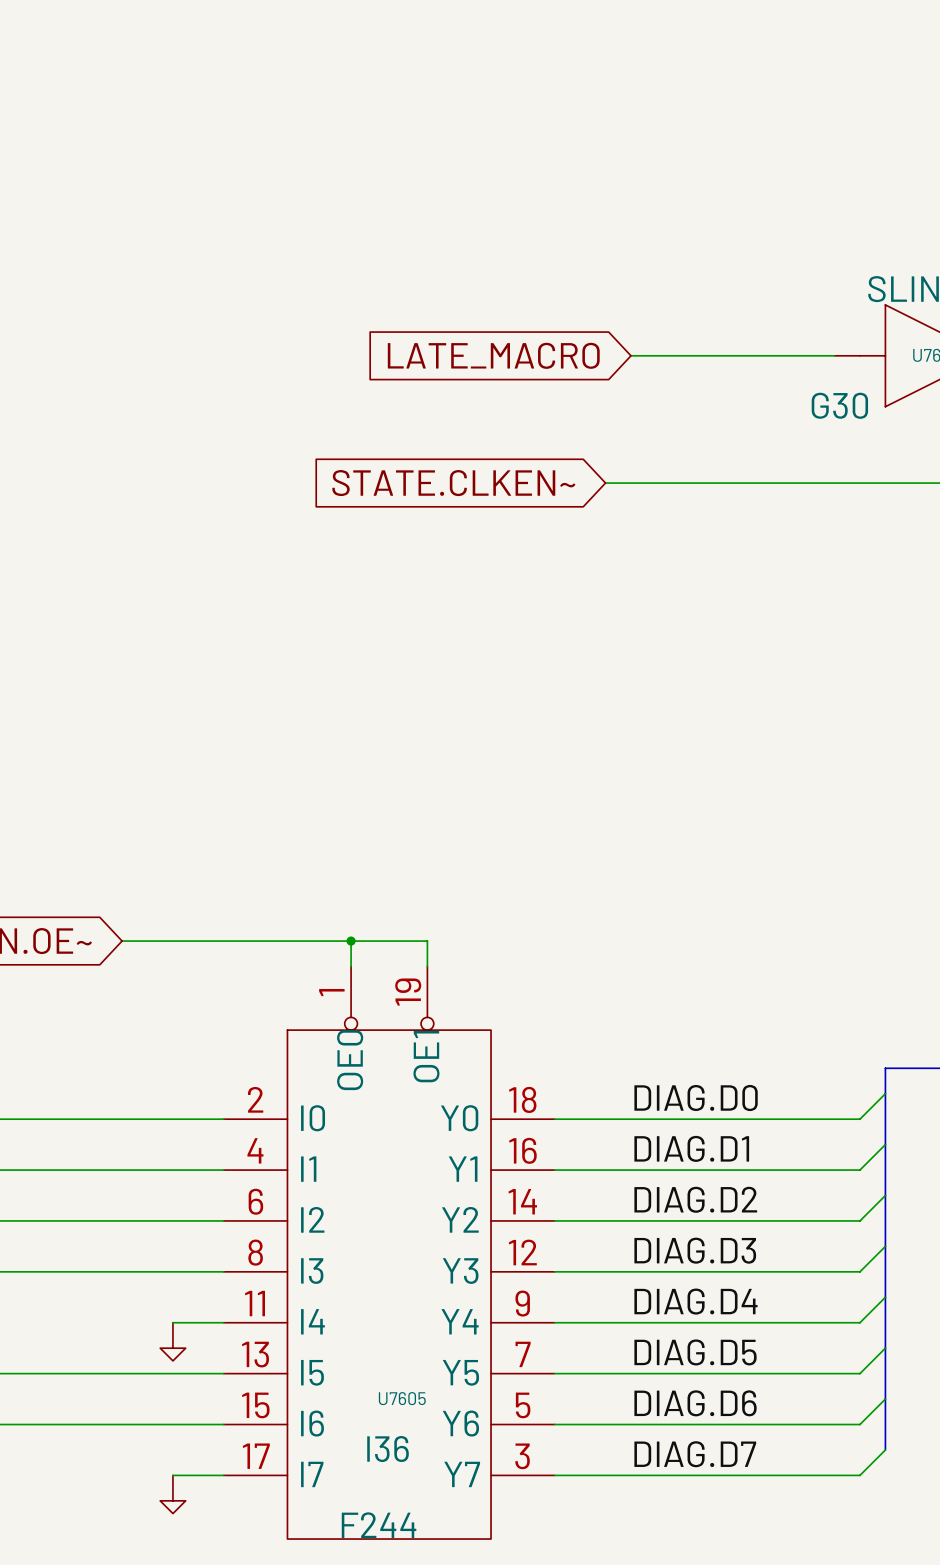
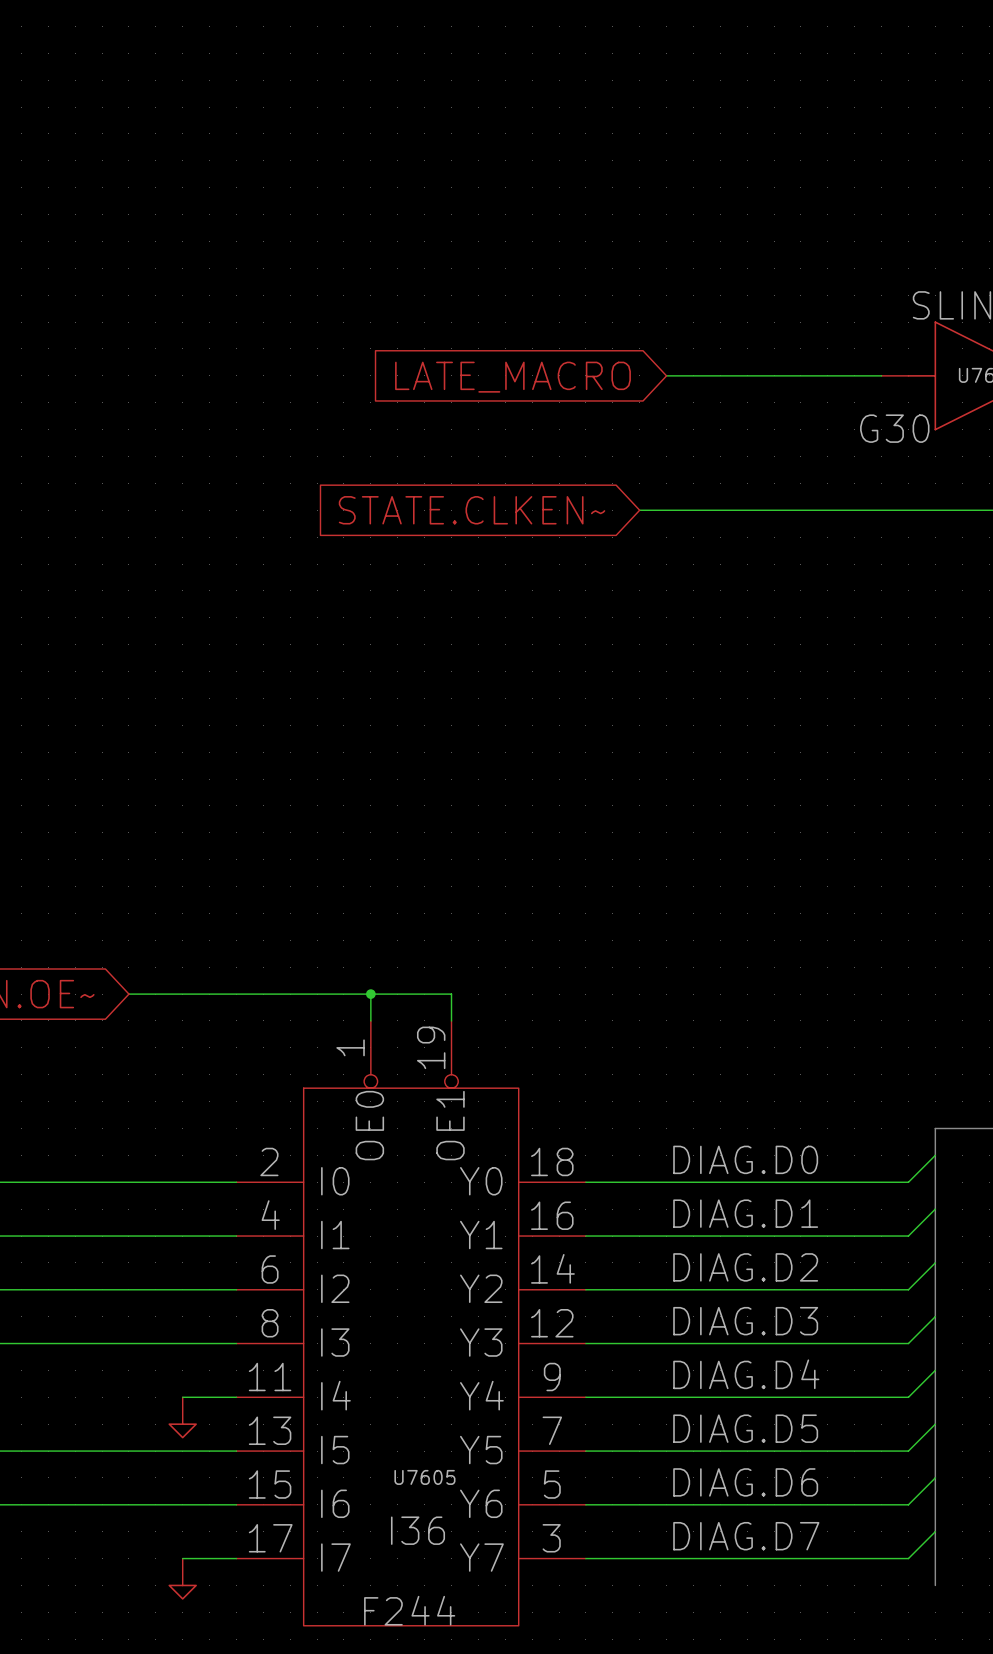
bus: none -> (935, 1531) (935, 1585)

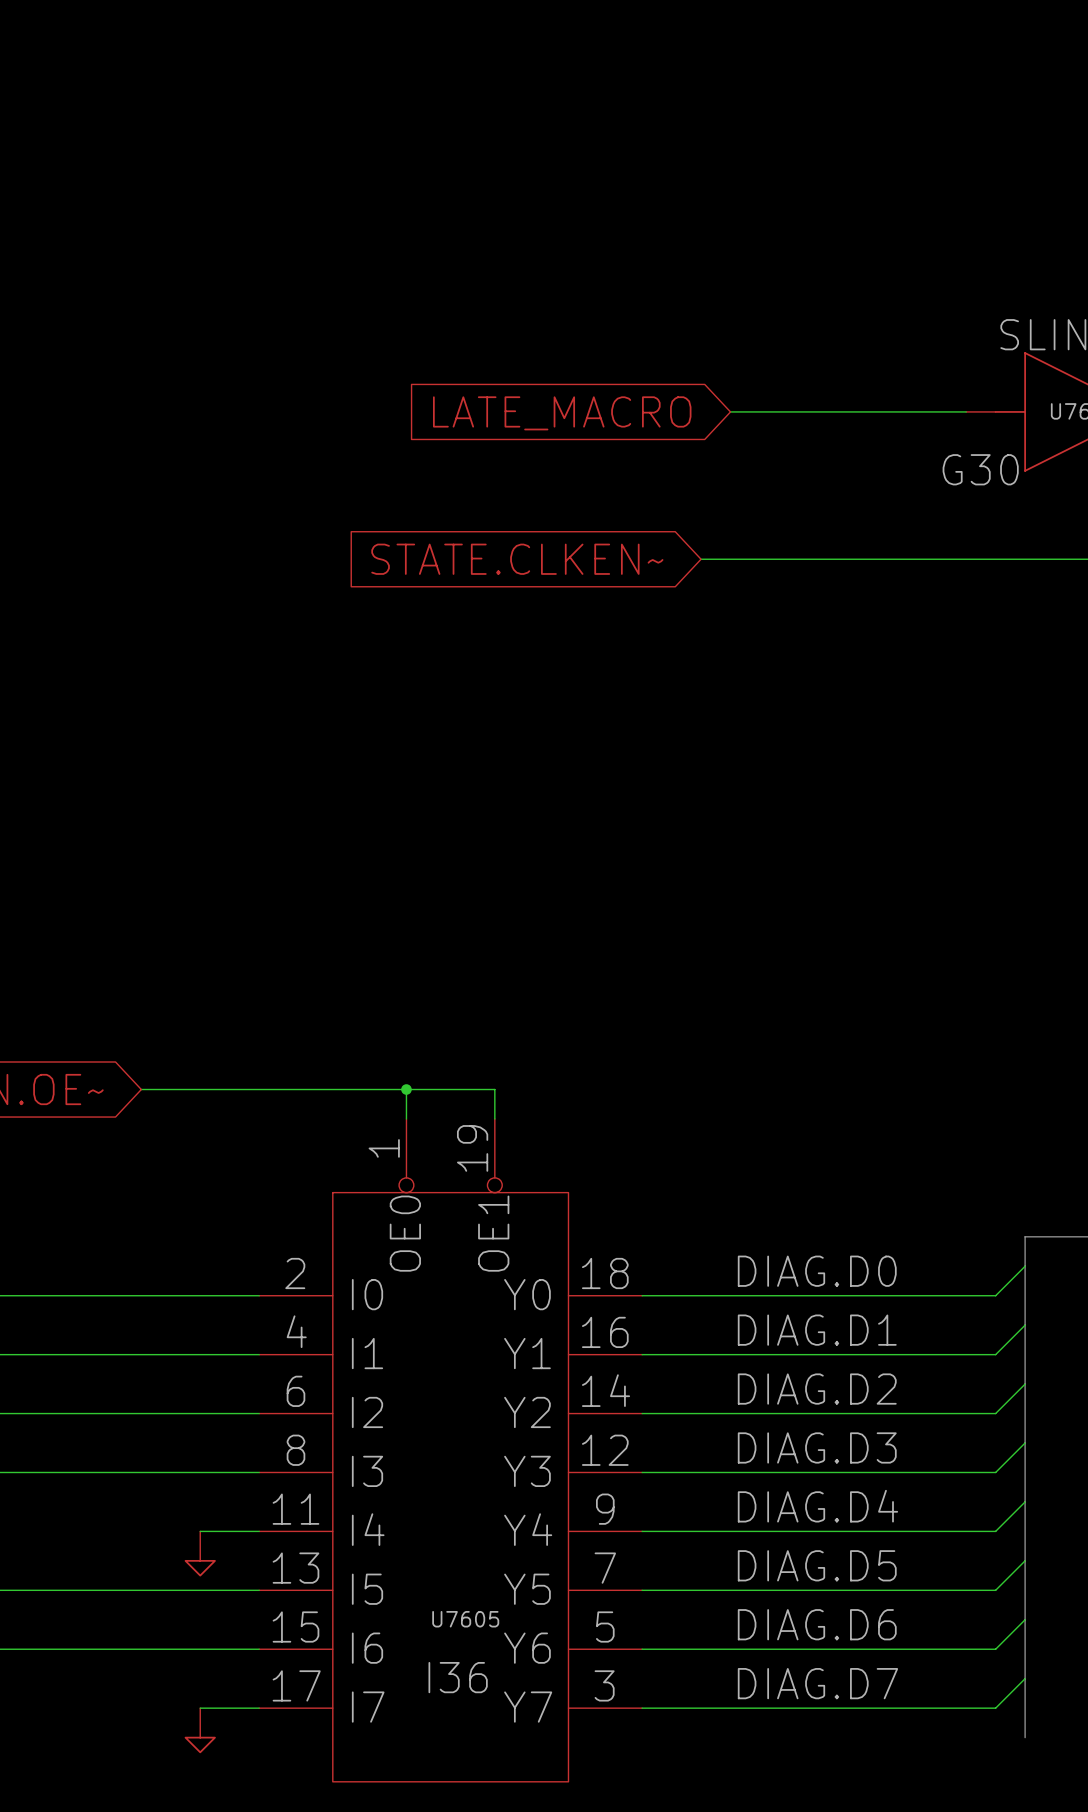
U7605 value: F244 (409, 1610) -> none

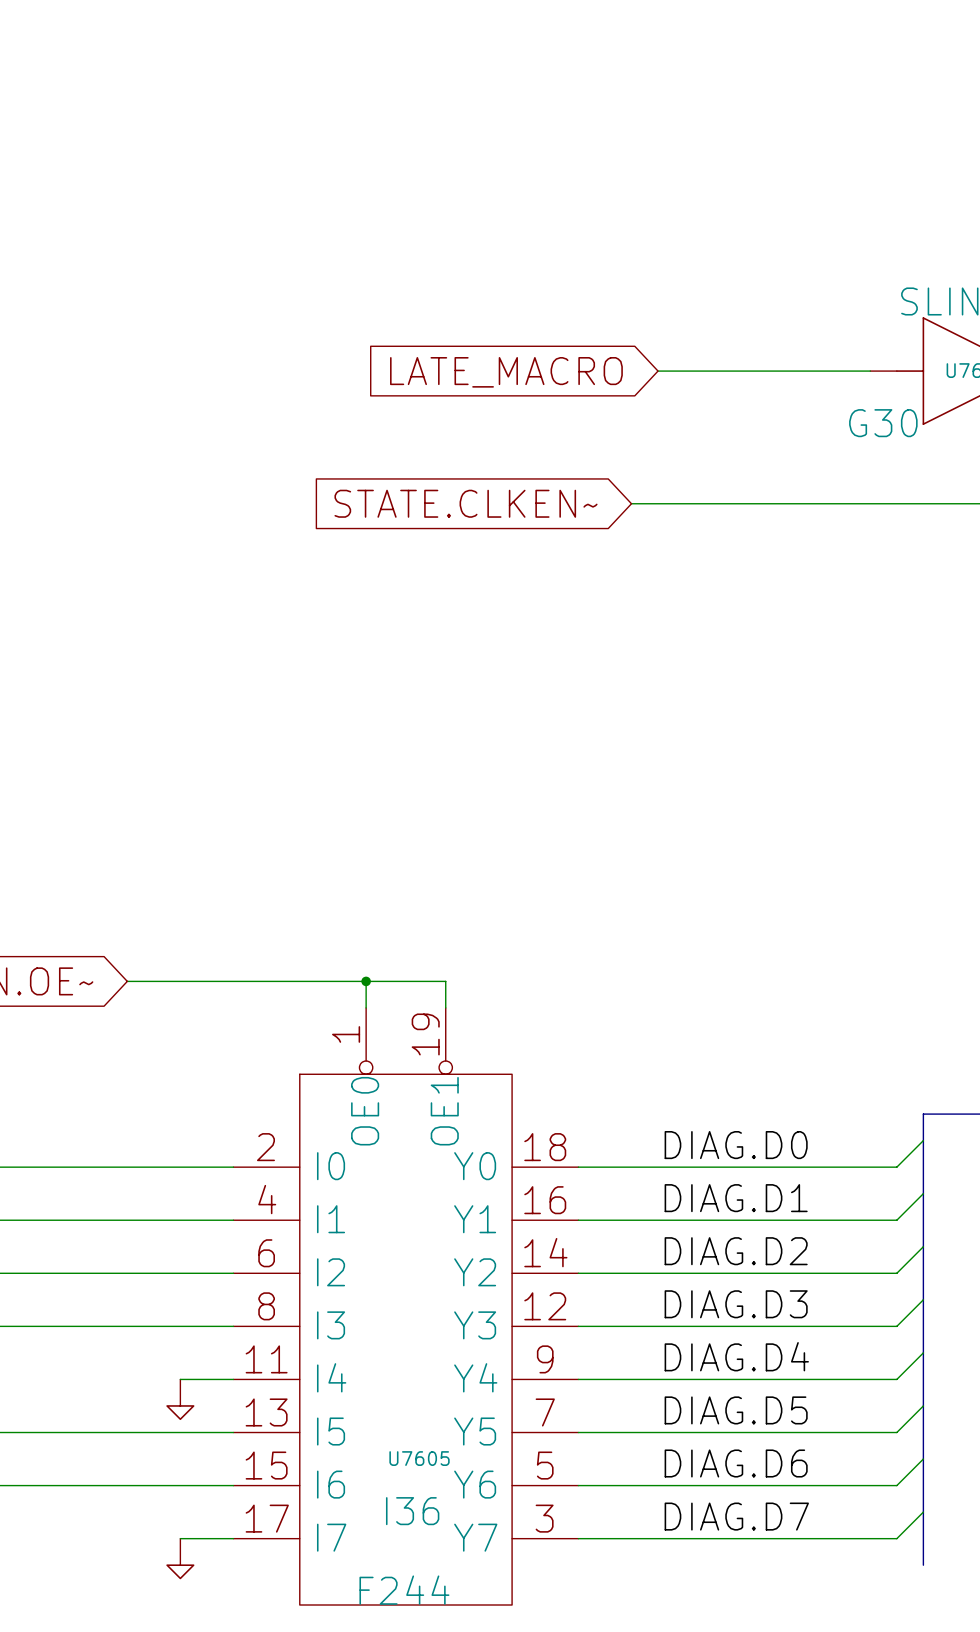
U7605 value: none -> F244 (404, 1590)

